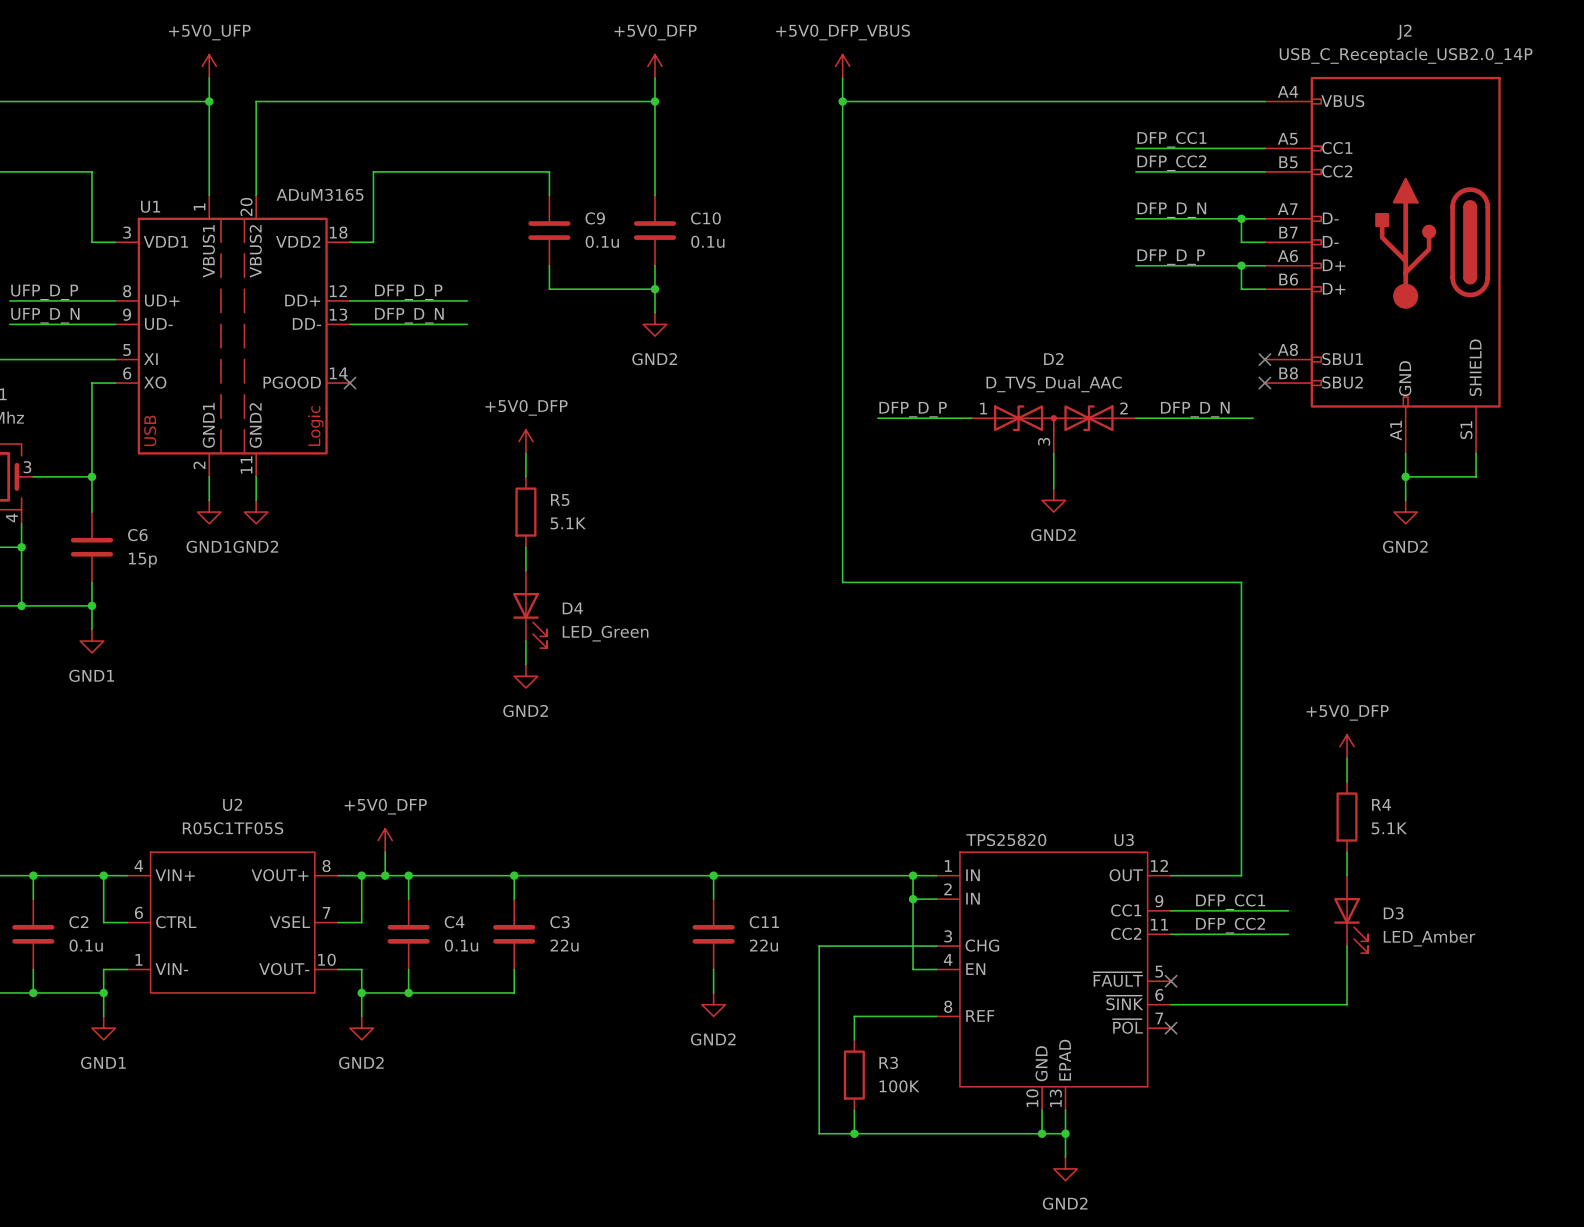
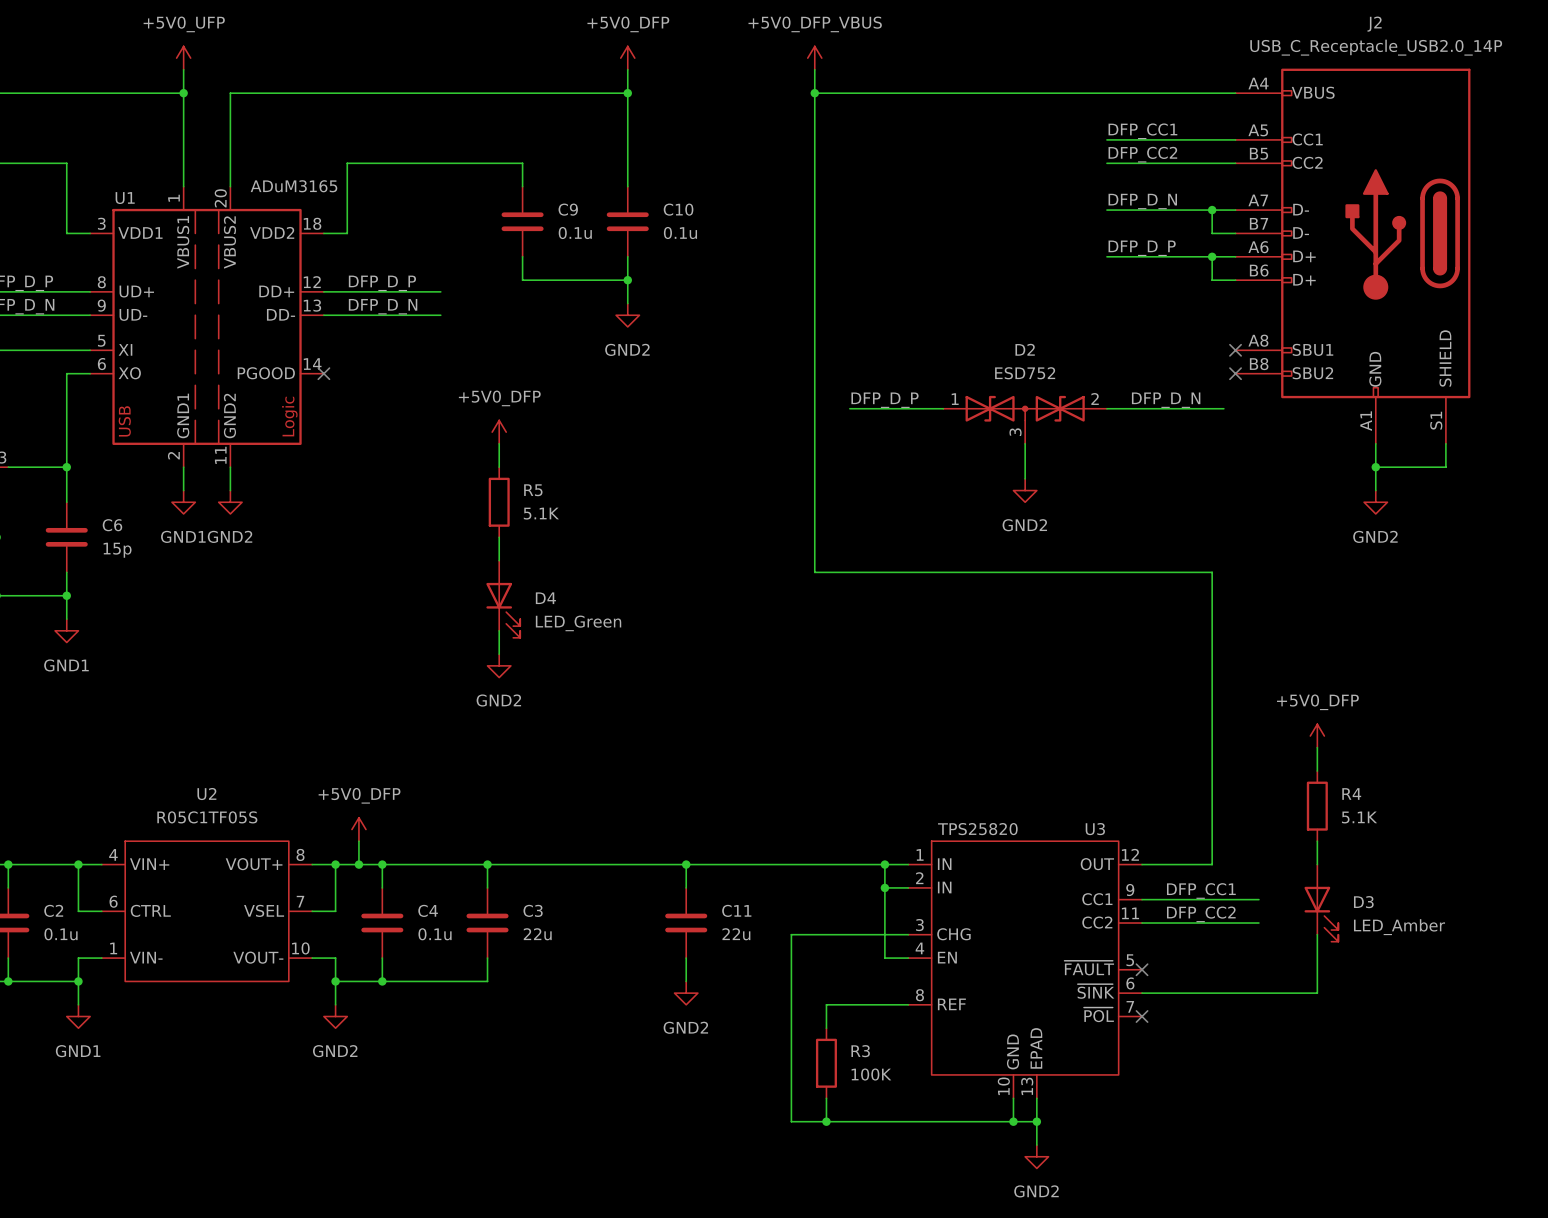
D2 value: D_TVS_Dual_AAC (1054, 384) -> ESD752 (1025, 373)

